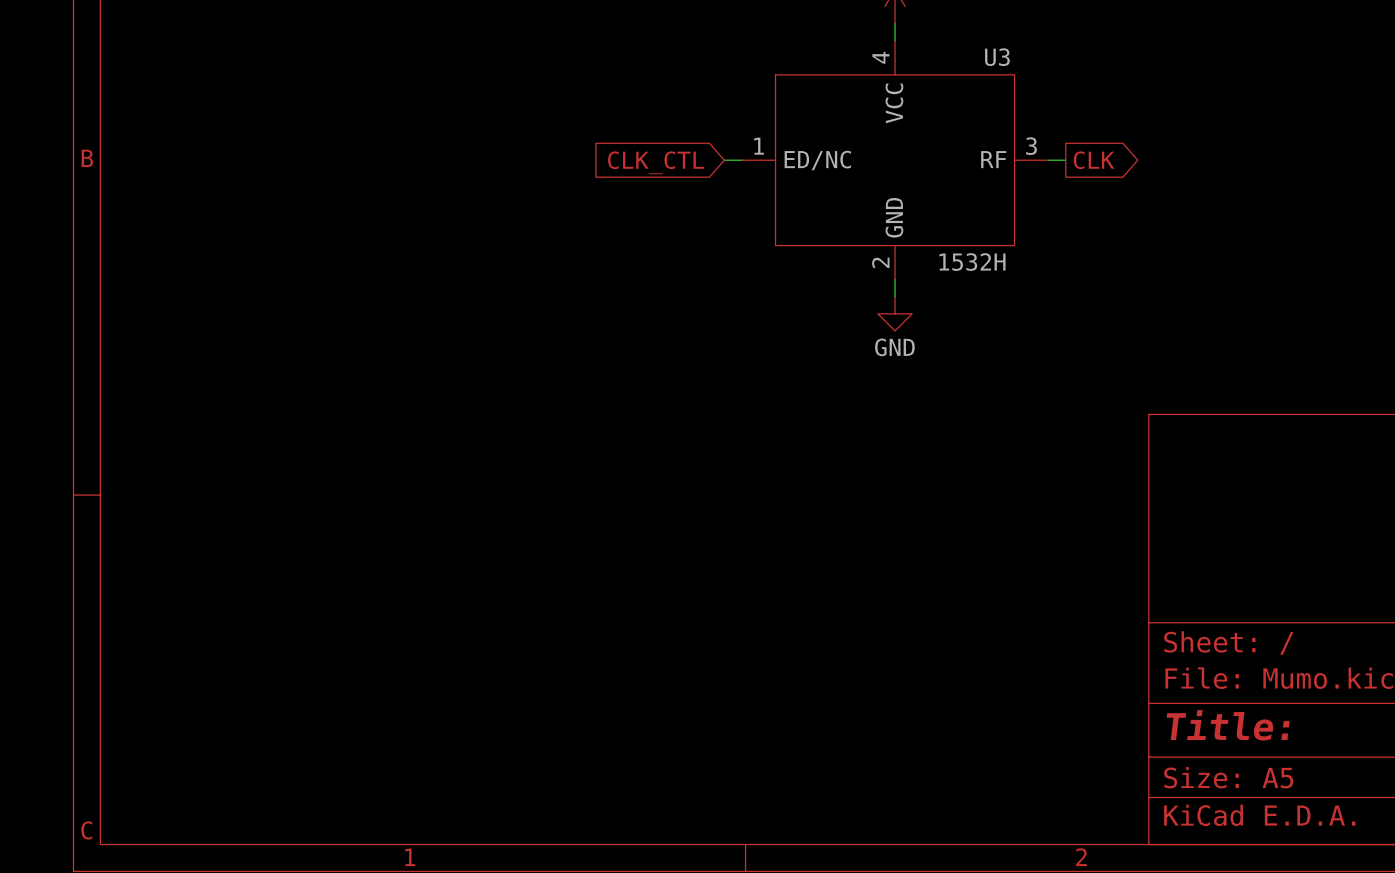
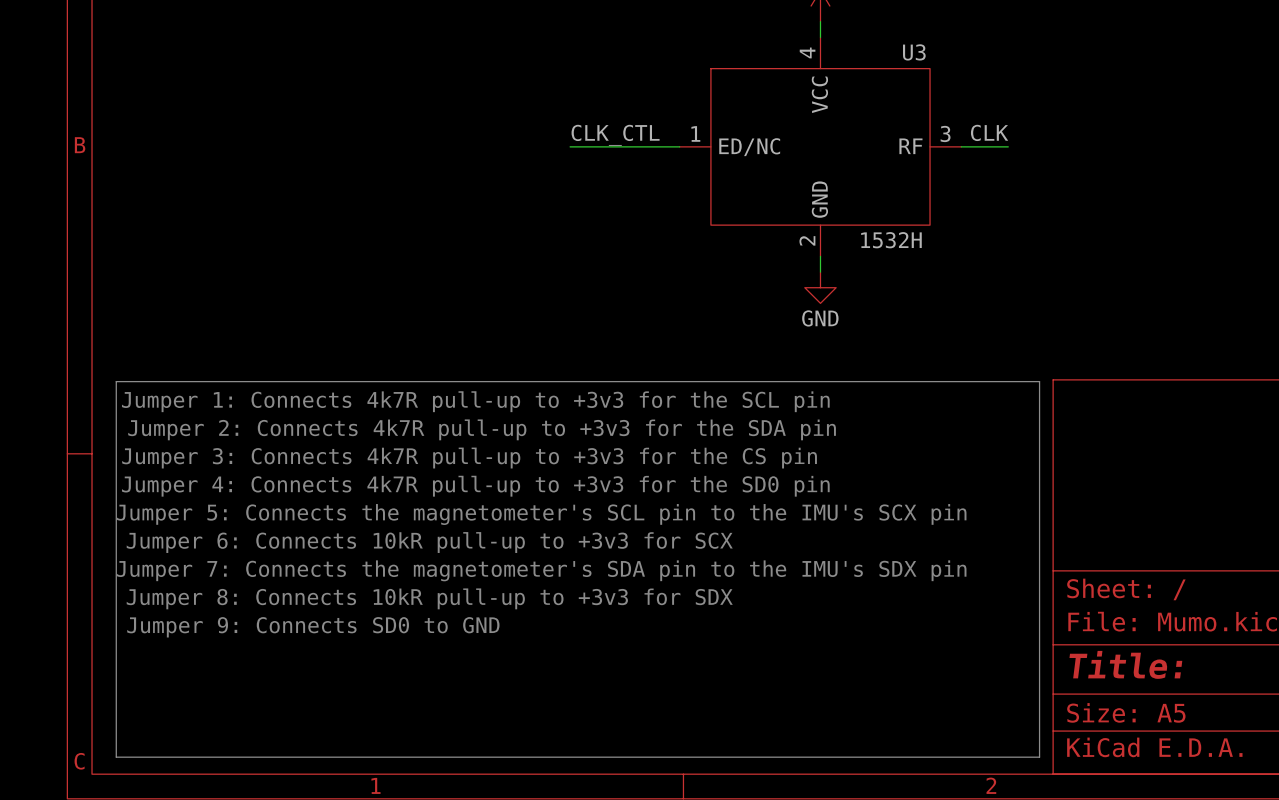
label: none -> CLK (989, 132)
label: none -> CLK_CTL (615, 135)
wire: none -> (570, 146) (663, 146)
wire: none -> (976, 146) (1008, 146)
global label: CLK (1094, 160) -> none
global label: CLK_CTL (656, 162) -> none
line: none -> (116, 381) (1039, 381) (1039, 757) (116, 757) (116, 381)
text: none -> Jumper 1: Connects 4k7R pull-up to +3v3 for the SCL pin (475, 401)
text: none -> Jumper 2: Connects 4k7R pull-up to +3v3 for the SDA pin (482, 429)
text: none -> Jumper 3: Connects 4k7R pull-up to +3v3 for the CS pin (469, 458)
text: none -> Jumper 4: Connects 4k7R pull-up to +3v3 for the SD0 pin (475, 486)
text: none -> Jumper 5: Connects the magnetometer's SCL pin to the IMU's SCX pin (541, 514)
text: none -> Jumper 6: Connects 10kR pull-up to +3v3 for SCX (429, 542)
text: none -> Jumper 7: Connects the magnetometer's SDA pin to the IMU's SDX pin (541, 570)
text: none -> Jumper 8: Connects 10kR pull-up to +3v3 for SDX (429, 598)
text: none -> Jumper 9: Connects SD0 to GND (313, 627)

